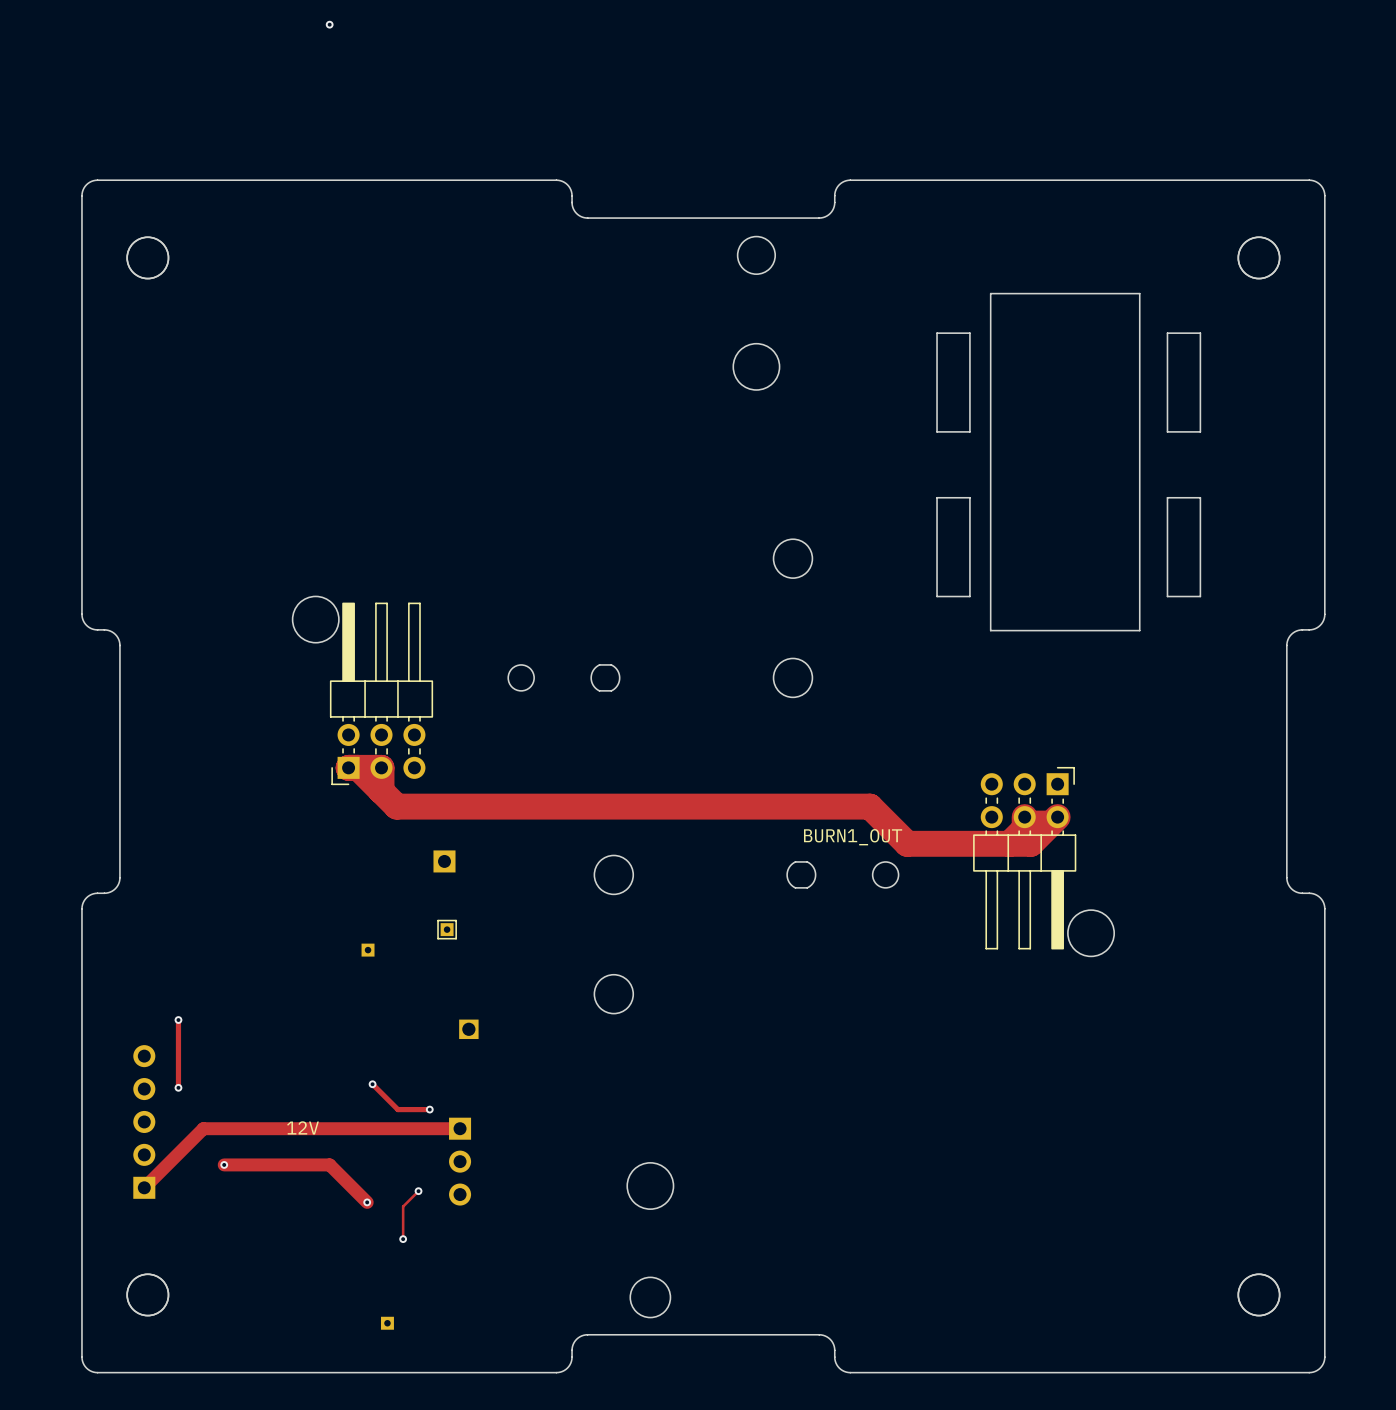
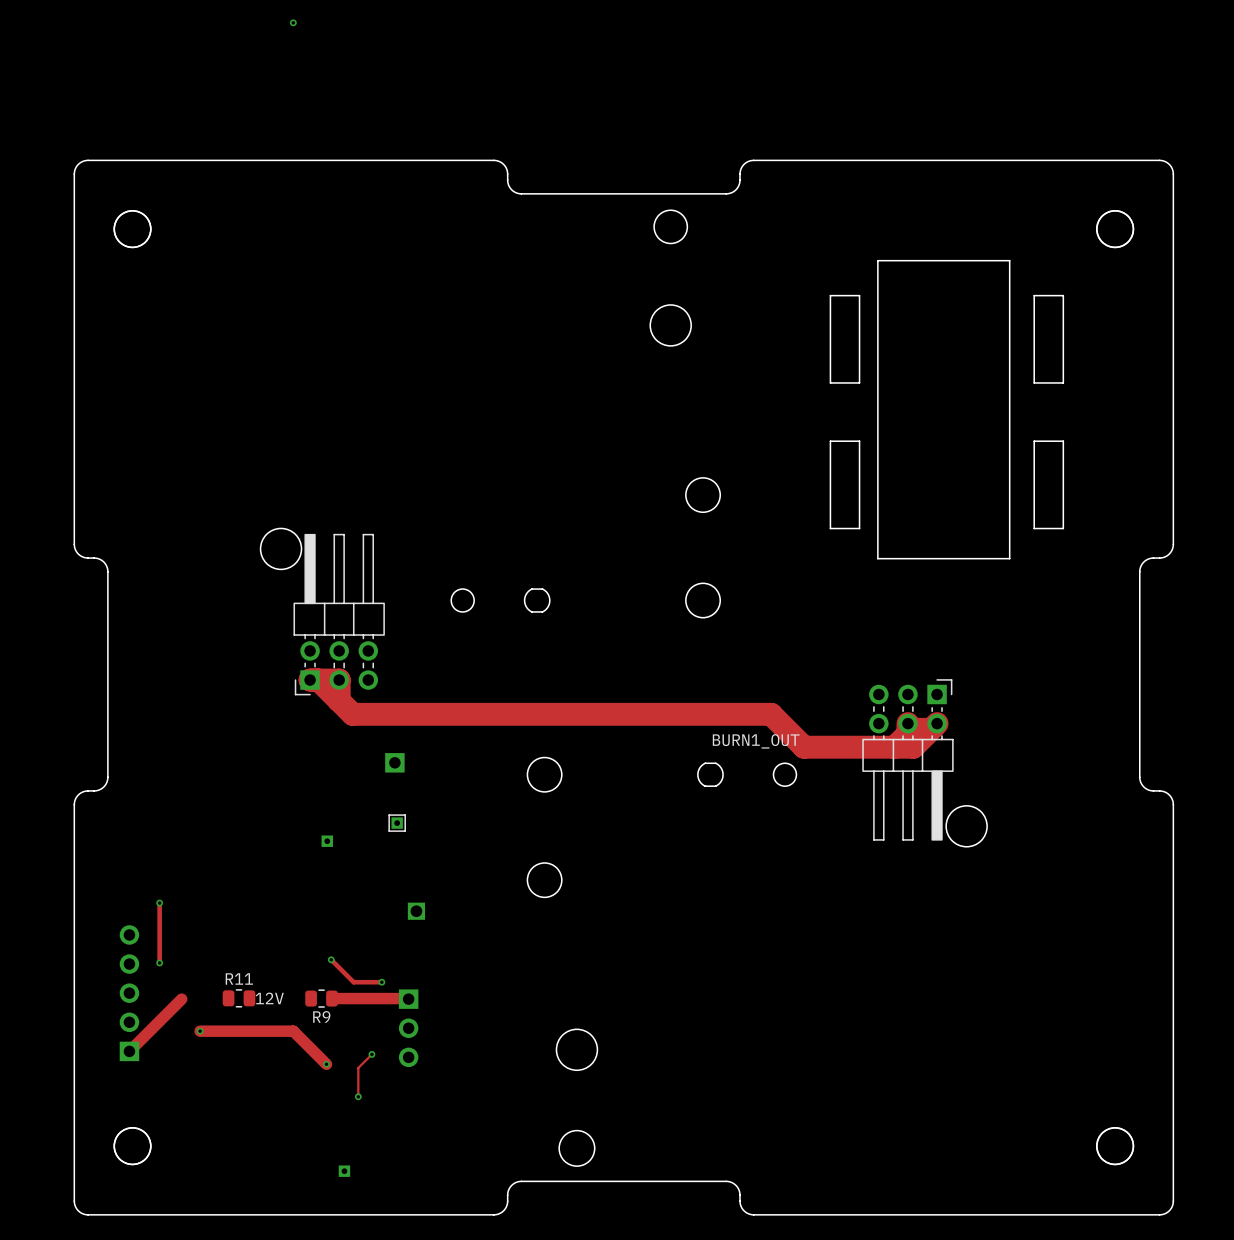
R11: none -> (239, 998)
track: (203, 1128) (460, 1128) -> (332, 998) (408, 999)
R9: none -> (321, 998)

